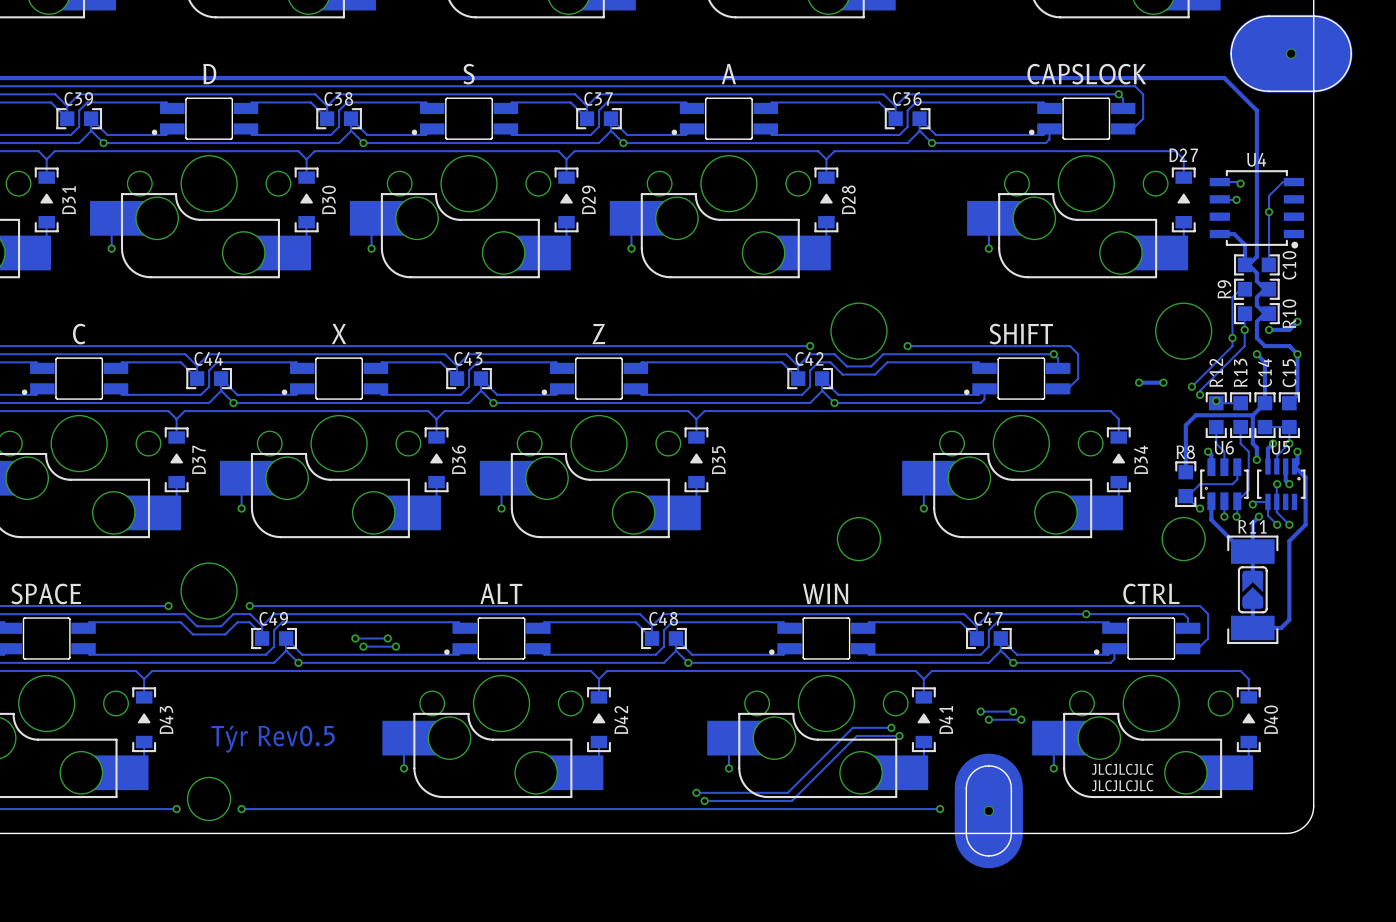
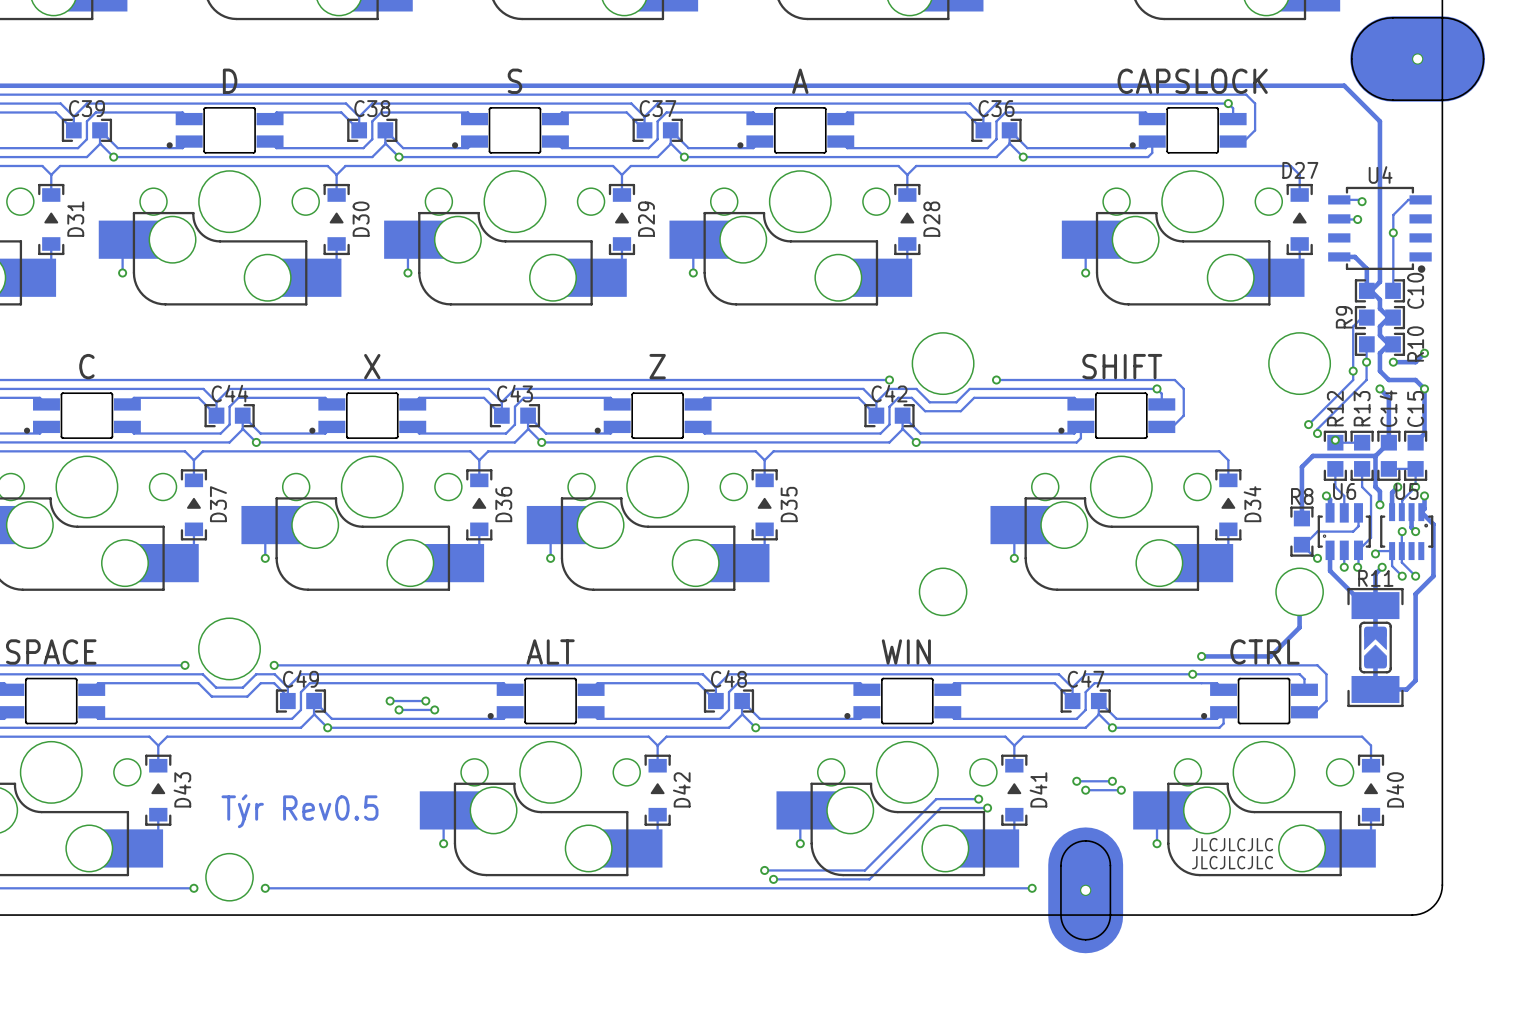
via: (1139, 382) -> none
track: (1163, 382) (1139, 382) -> none
via: (1163, 382) -> none
track: none -> (1299, 591) (1299, 627) (1270, 656) (1201, 656)
via: none -> (1201, 656)

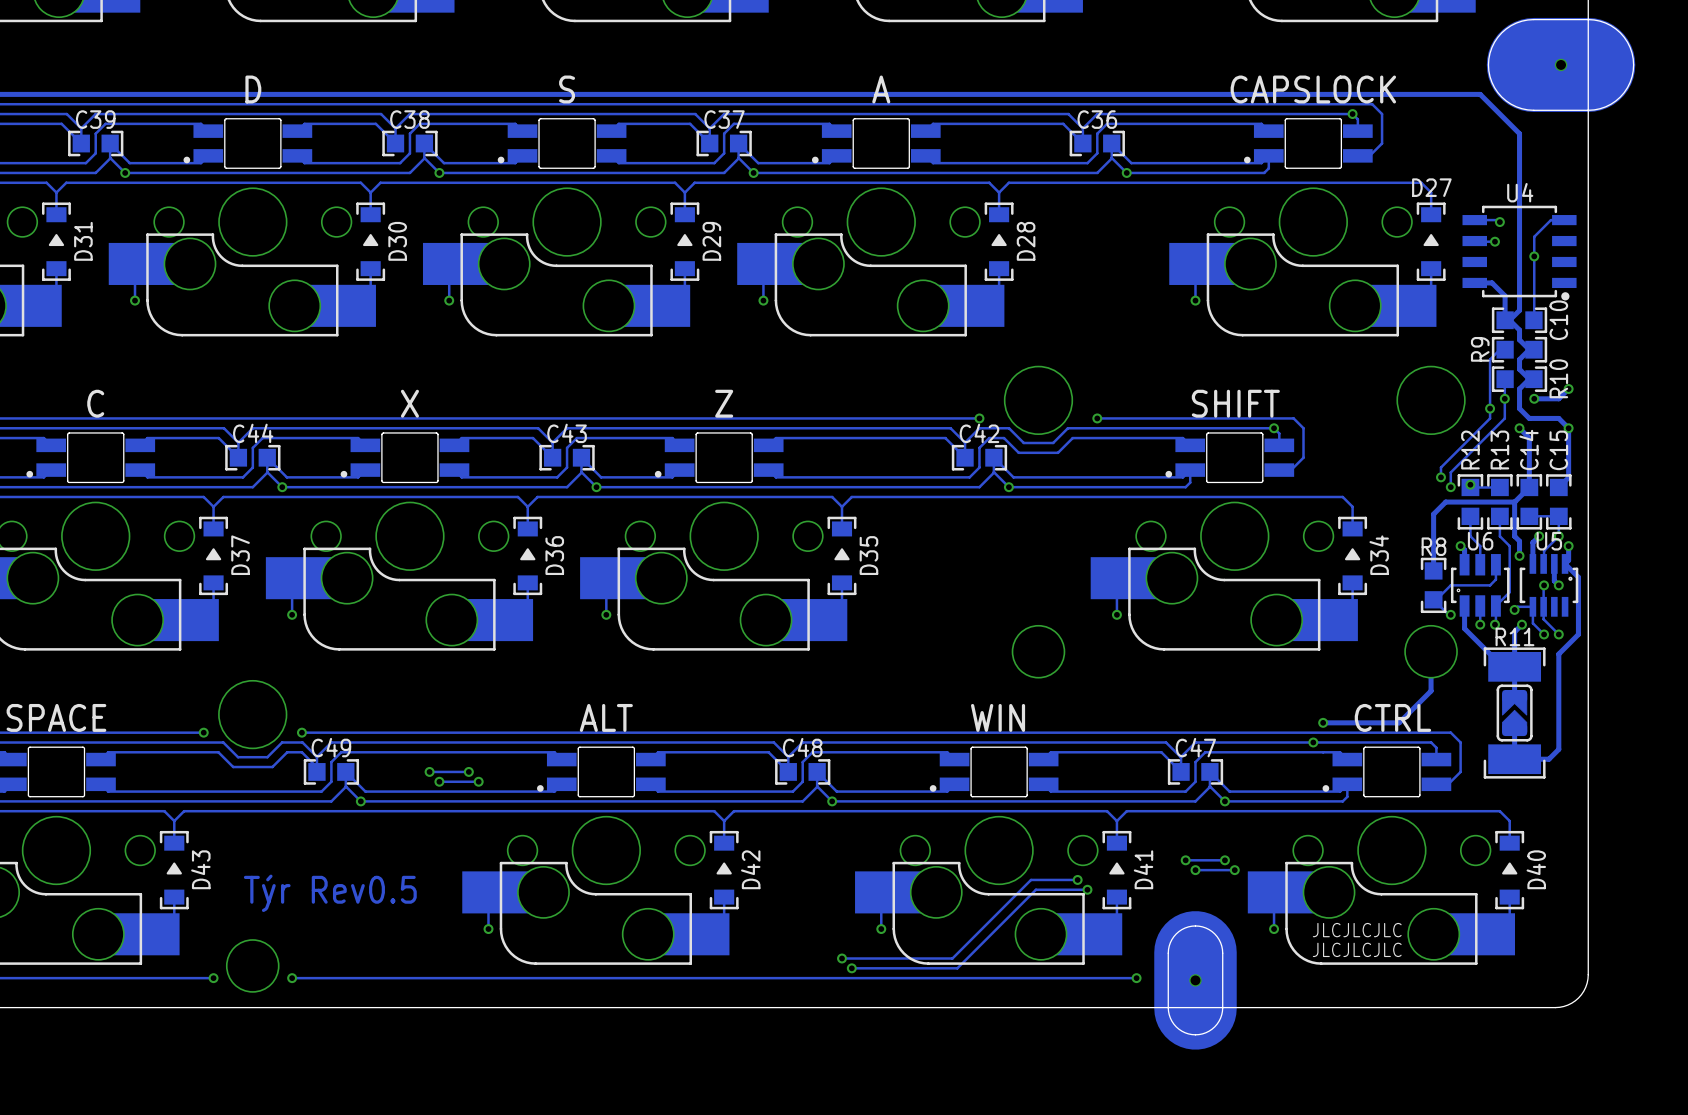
track: none -> (1440, 467) (1440, 477)
via: (1308, 424) -> none
via: none -> (1440, 477)
track: none -> (1450, 477) (1450, 487)
via: (1317, 433) -> none
via: none -> (1450, 487)

